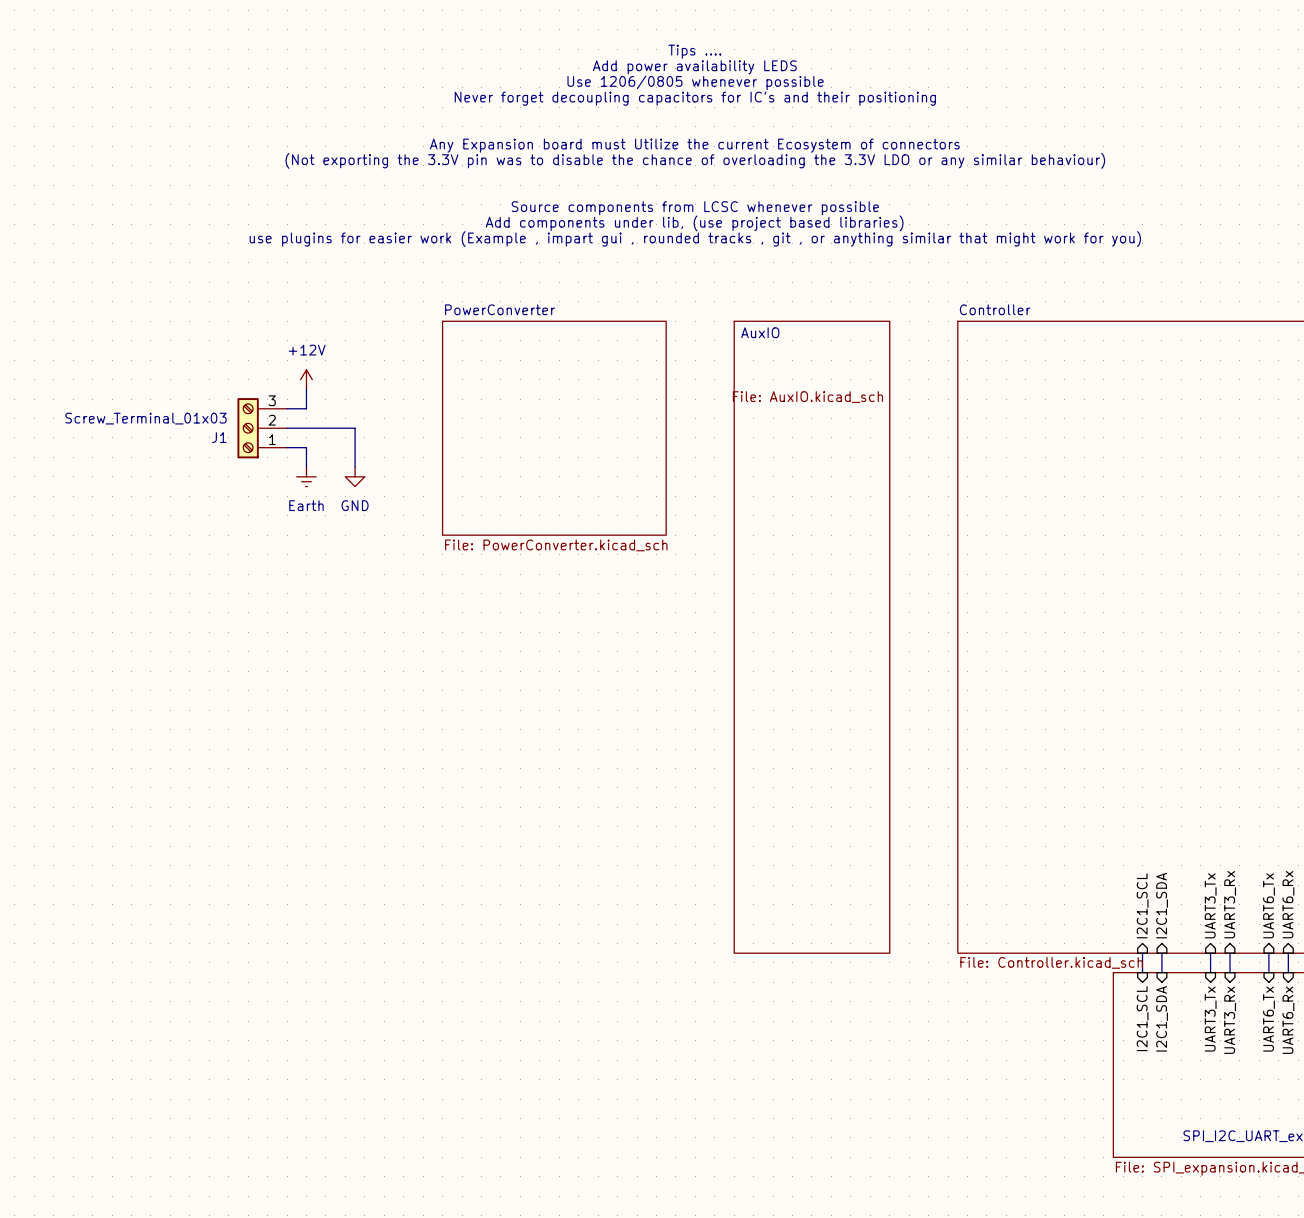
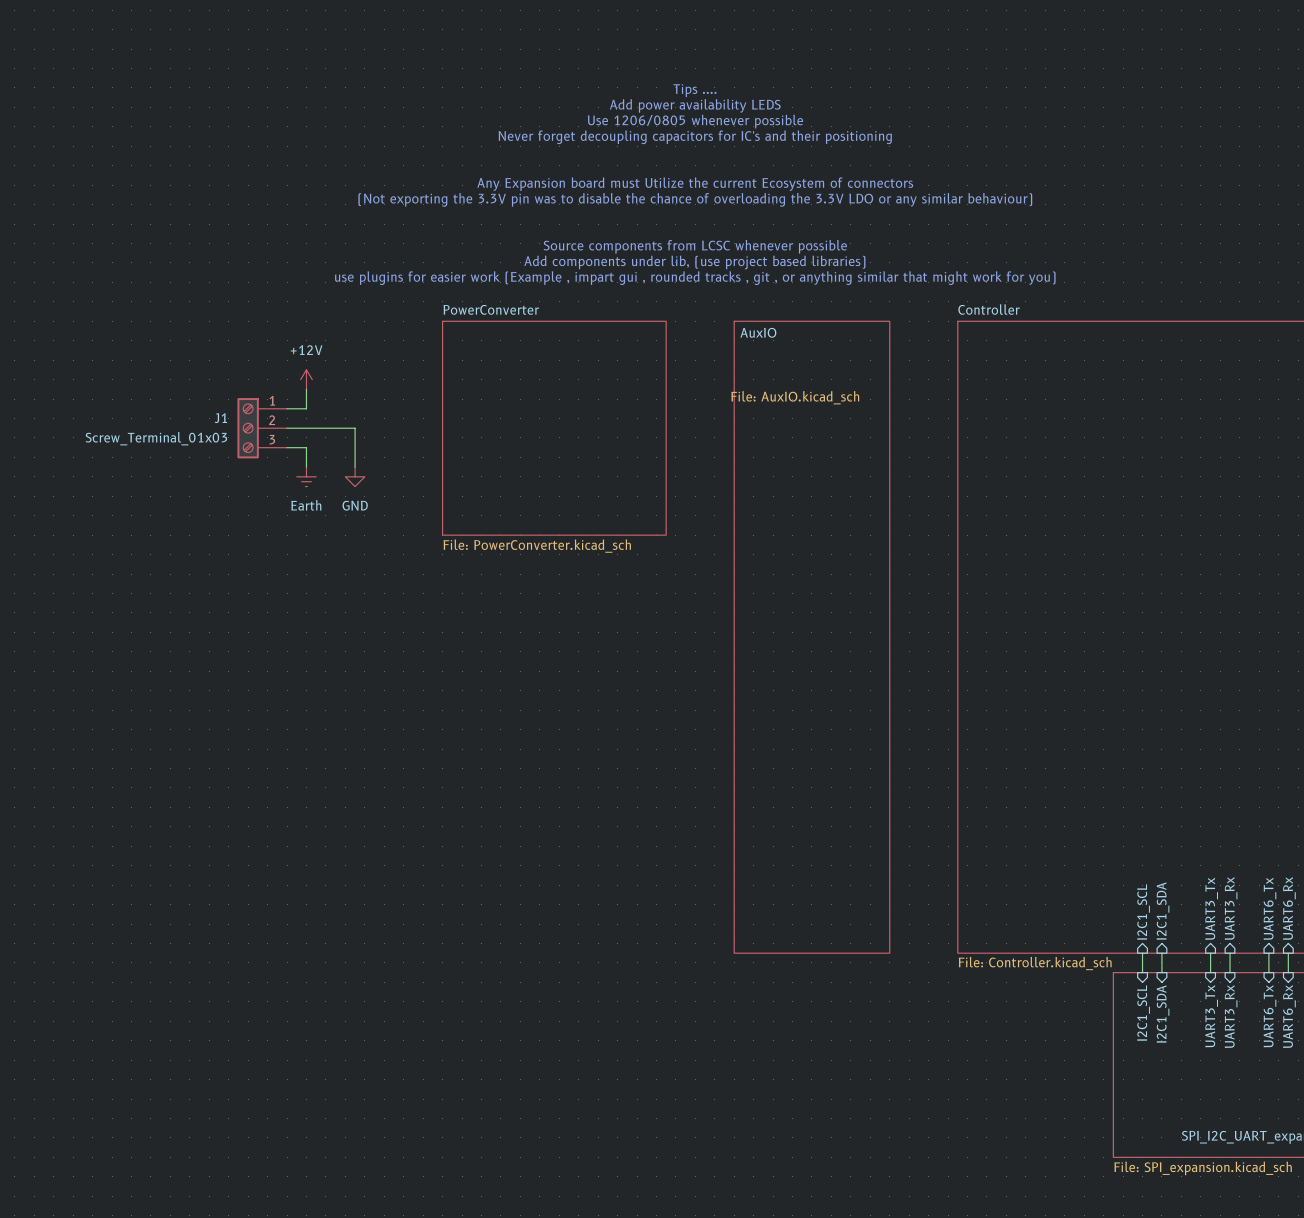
text position: Tips .... (694, 51) -> Tips .... (694, 90)
text position: Add power availability LEDS (694, 67) -> Add power availability LEDS (695, 105)
text position: Use 1206/0805 whenever possible (695, 82) -> Use 1206/0805 whenever possible (695, 121)
text position: Never forget decoupling capacitors for IC's and their positioning (695, 98) -> Never forget decoupling capacitors for IC's and their positioning (695, 137)
text position: Any Expansion board must Utilize the current Ecosystem of connectors (694, 145) -> Any Expansion board must Utilize the current Ecosystem of connectors (695, 184)
text position: (Not exporting the 3.3V pin was to disable the chance of overloading the 3.3V LDO or any similar behaviour) (695, 160) -> (Not exporting the 3.3V pin was to disable the chance of overloading the 3.3V LDO or any similar behaviour) (695, 199)
text position: Source components from LCSC whenever possible (695, 208) -> Source components from LCSC whenever possible (695, 246)
text position: Add components under lib, (use project based libraries) (694, 223) -> Add components under lib, (use project based libraries) (694, 262)
text position: use plugins for easier work (Example , impart gui , rounded tracks , git , or anything similar that might work for you) (695, 239) -> use plugins for easier work (Example , impart gui , rounded tracks , git , or anything similar that might work for you) (695, 278)
J1 flip: as is (248, 428) -> up-down (248, 428)

